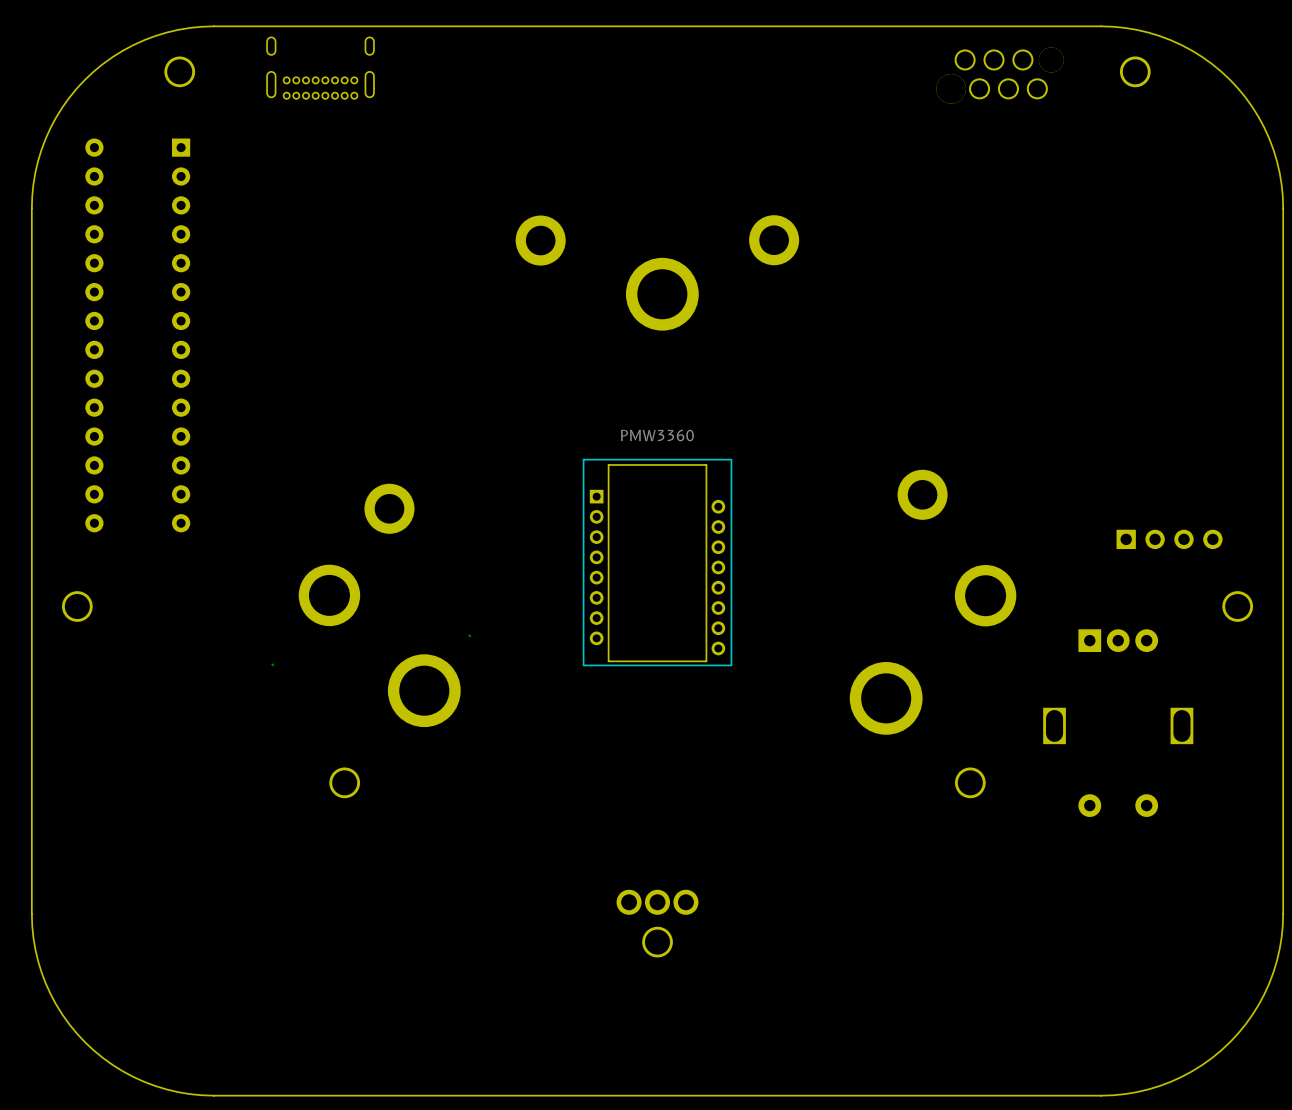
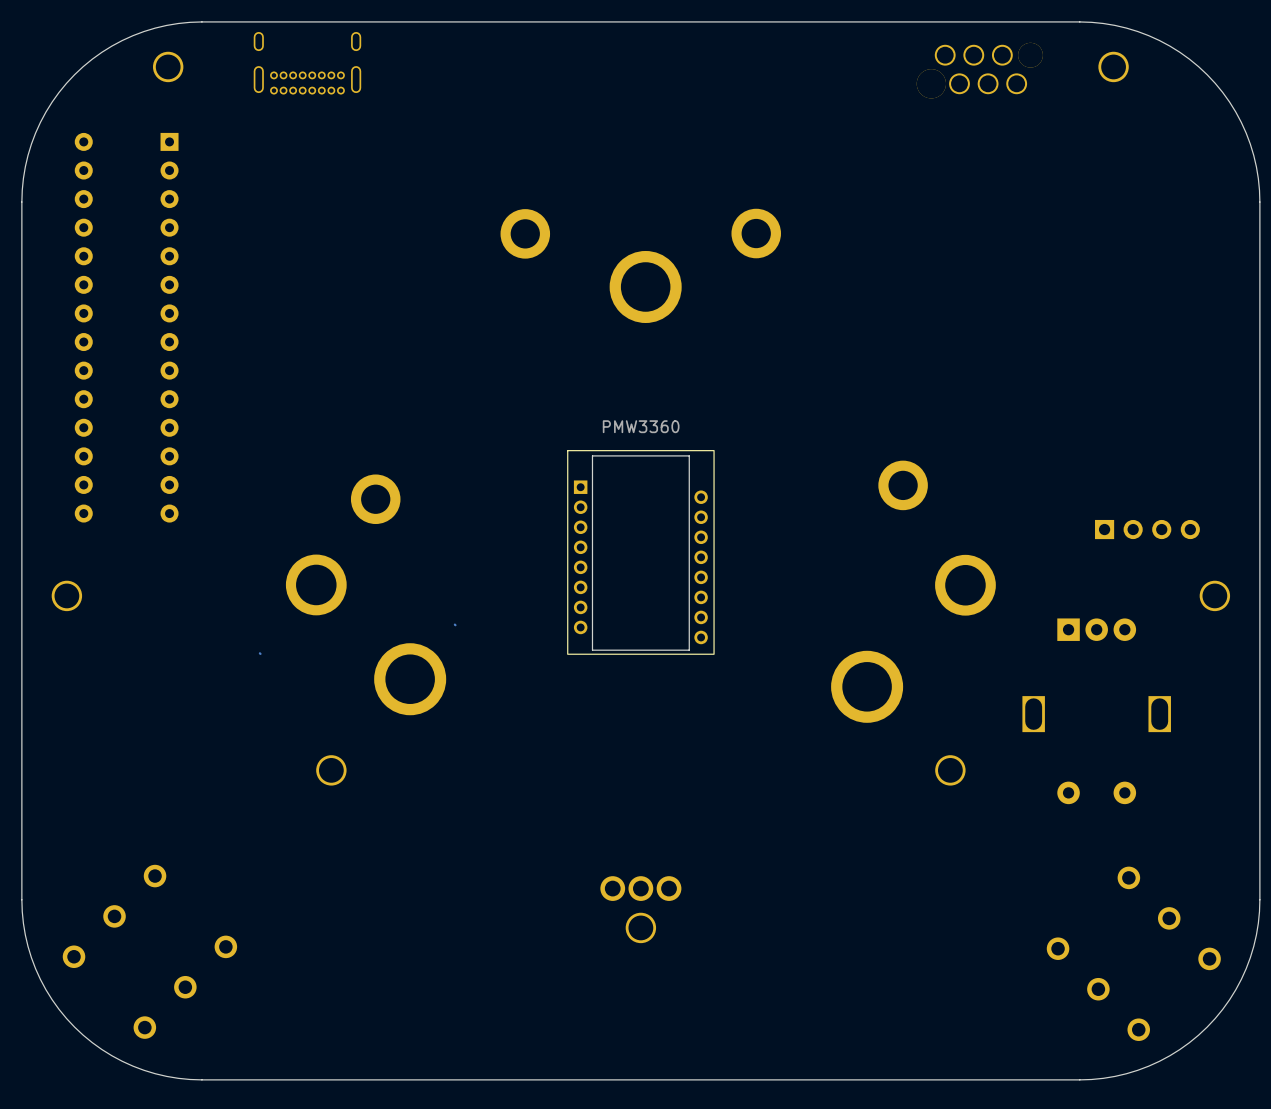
part: none -> (114, 916)
part: none -> (1169, 918)
part: none -> (185, 987)
part: none -> (1098, 989)

